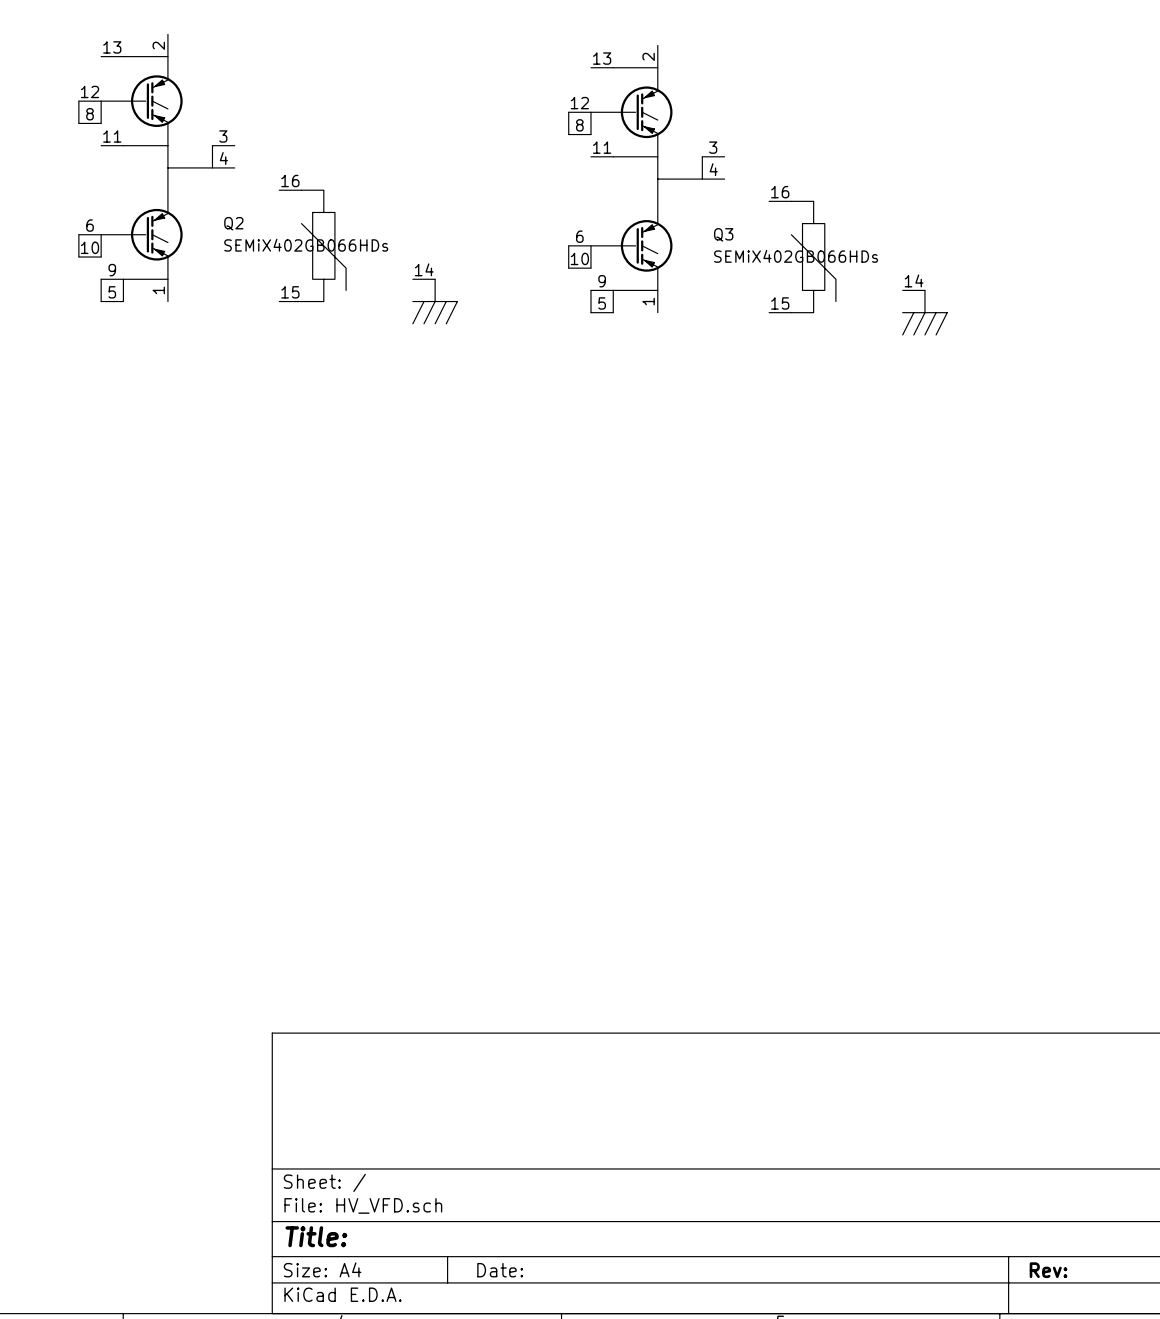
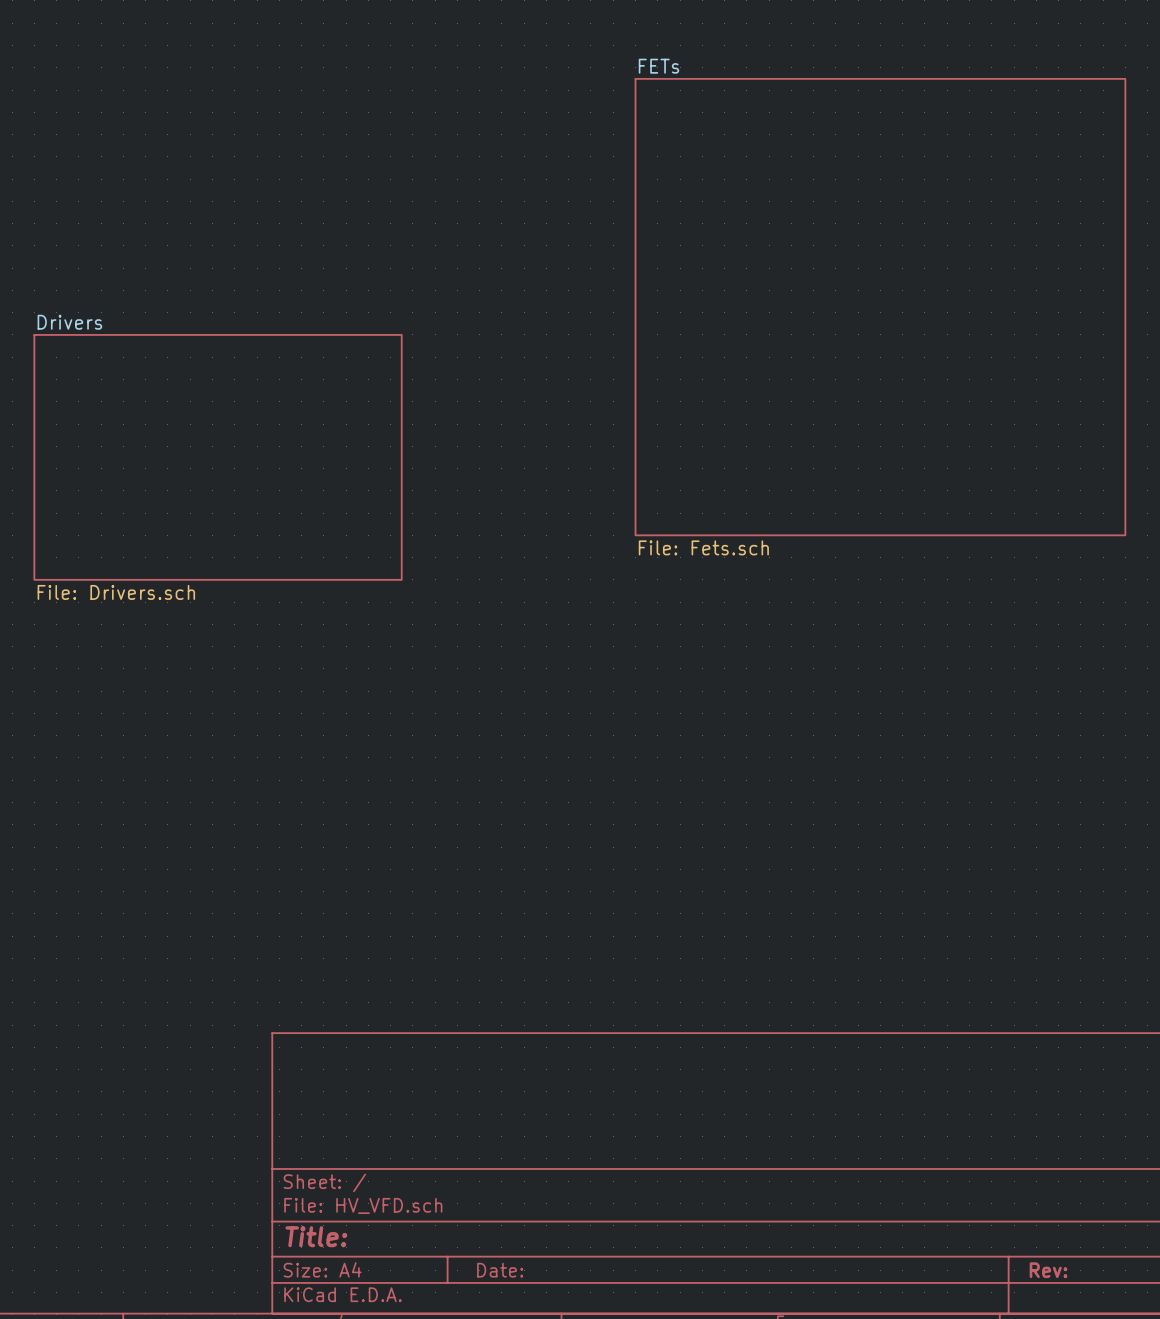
wire: (78, 101) (78, 123) -> none
wire: (568, 112) (568, 134) -> none
Q2: SEMiX402GB066HDs (268, 179) -> none
Q3: SEMiX402GB066HDs (757, 190) -> none
wire: (78, 234) (78, 257) -> none
wire: (568, 245) (568, 268) -> none
wire: (101, 279) (101, 301) -> none
wire: (590, 290) (590, 312) -> none
sheet FETs: none -> File: Fets.sch (880, 307)
sheet Drivers: none -> File: Drivers.sch (218, 457)

